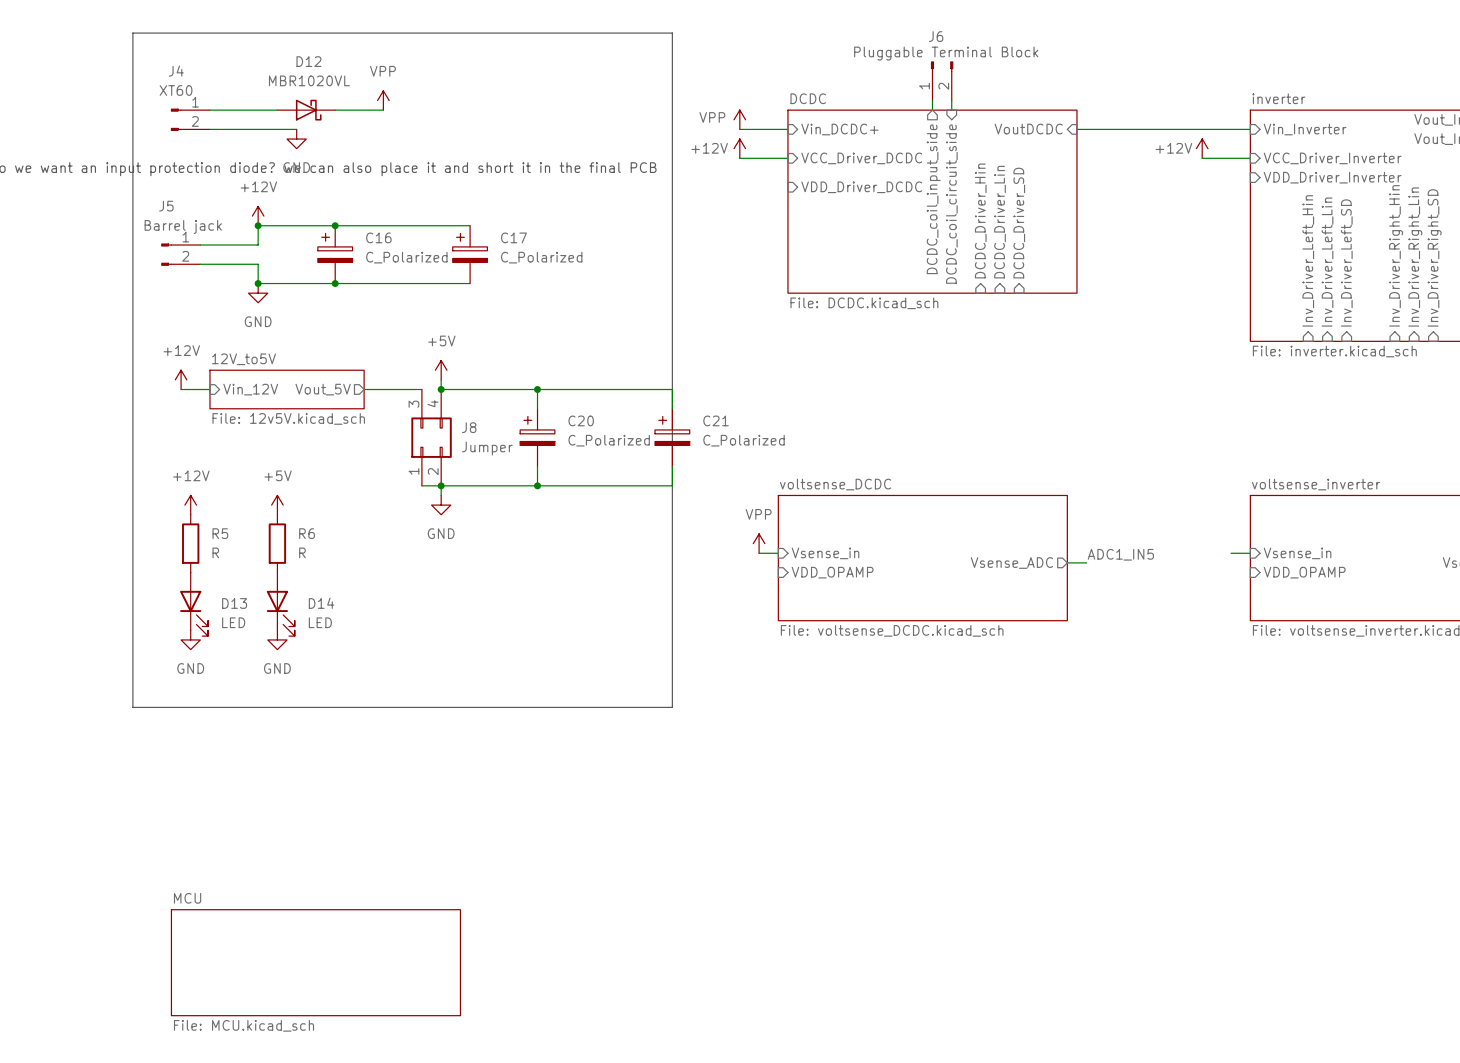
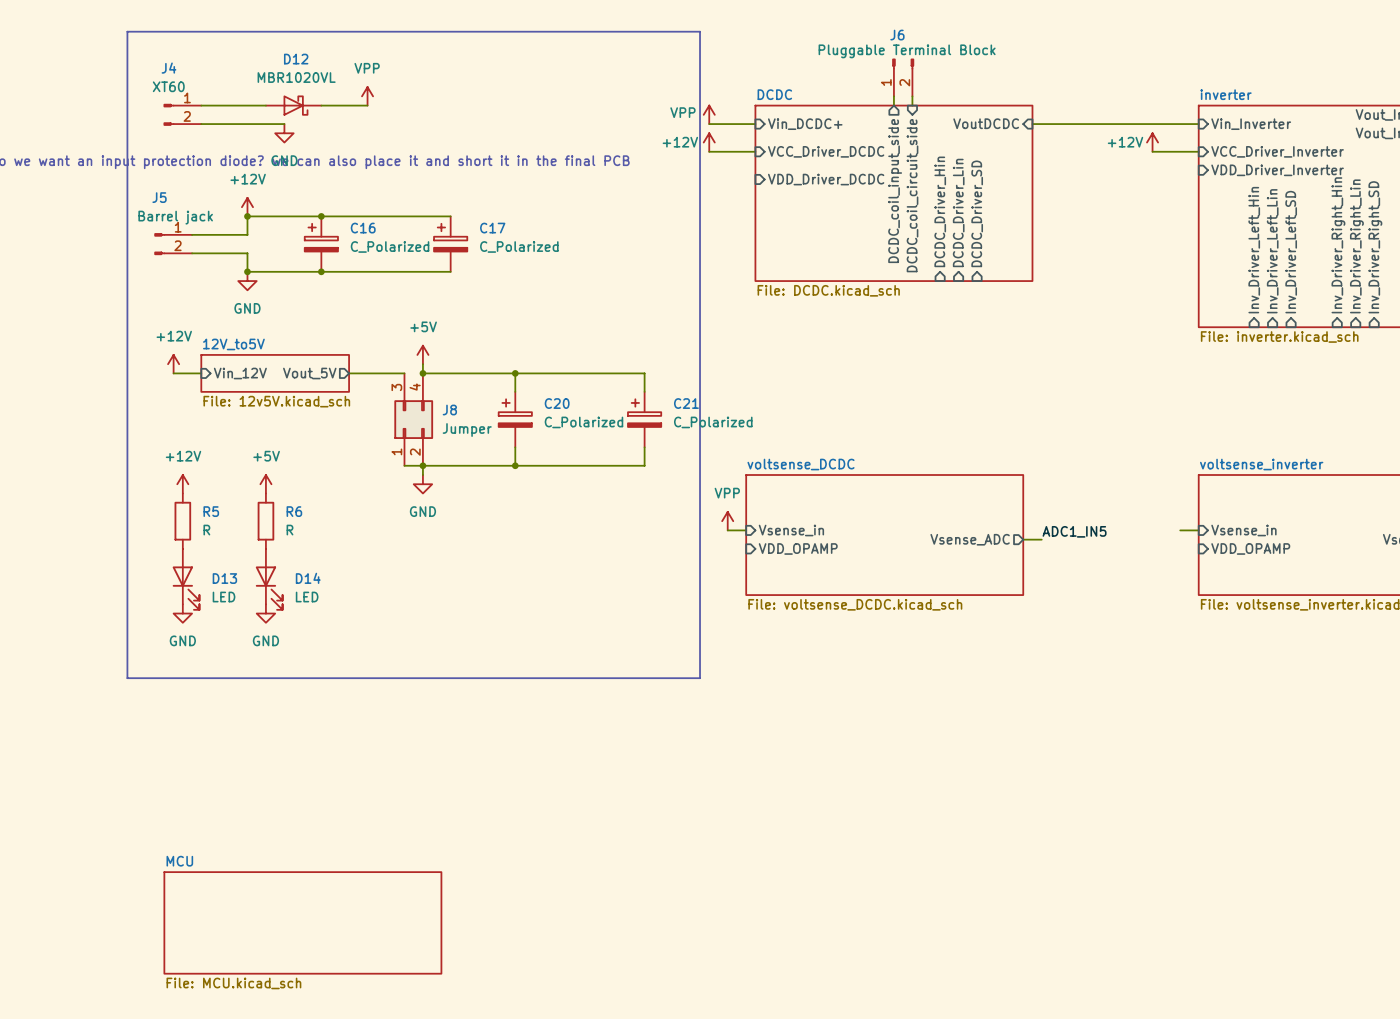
line: (672, 33) (672, 707) -> (644, 31) (700, 31) (700, 678) (644, 678)

